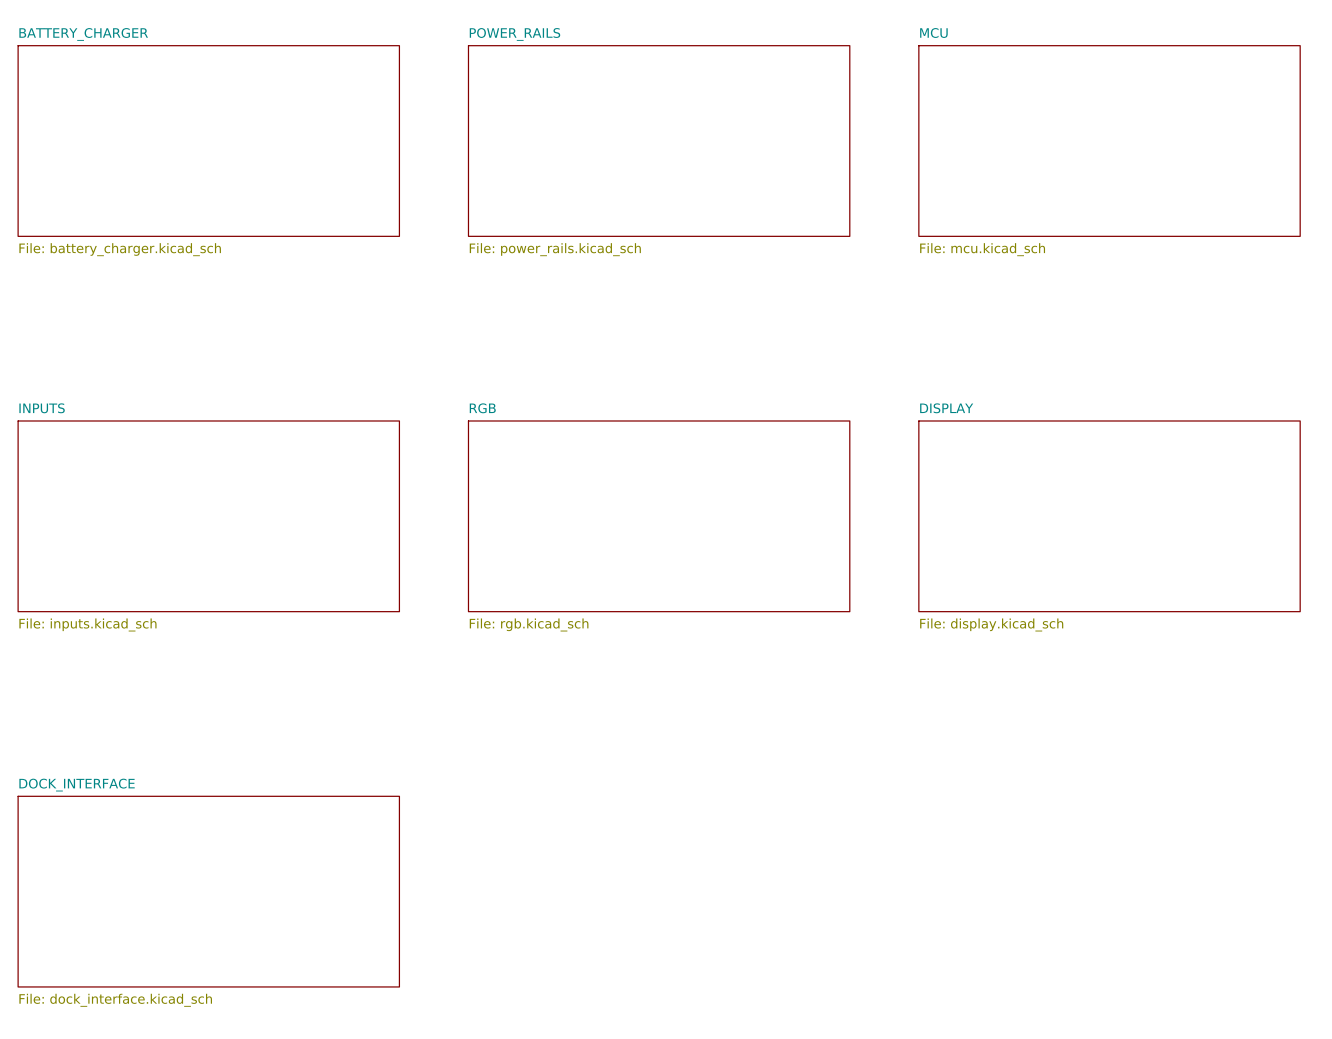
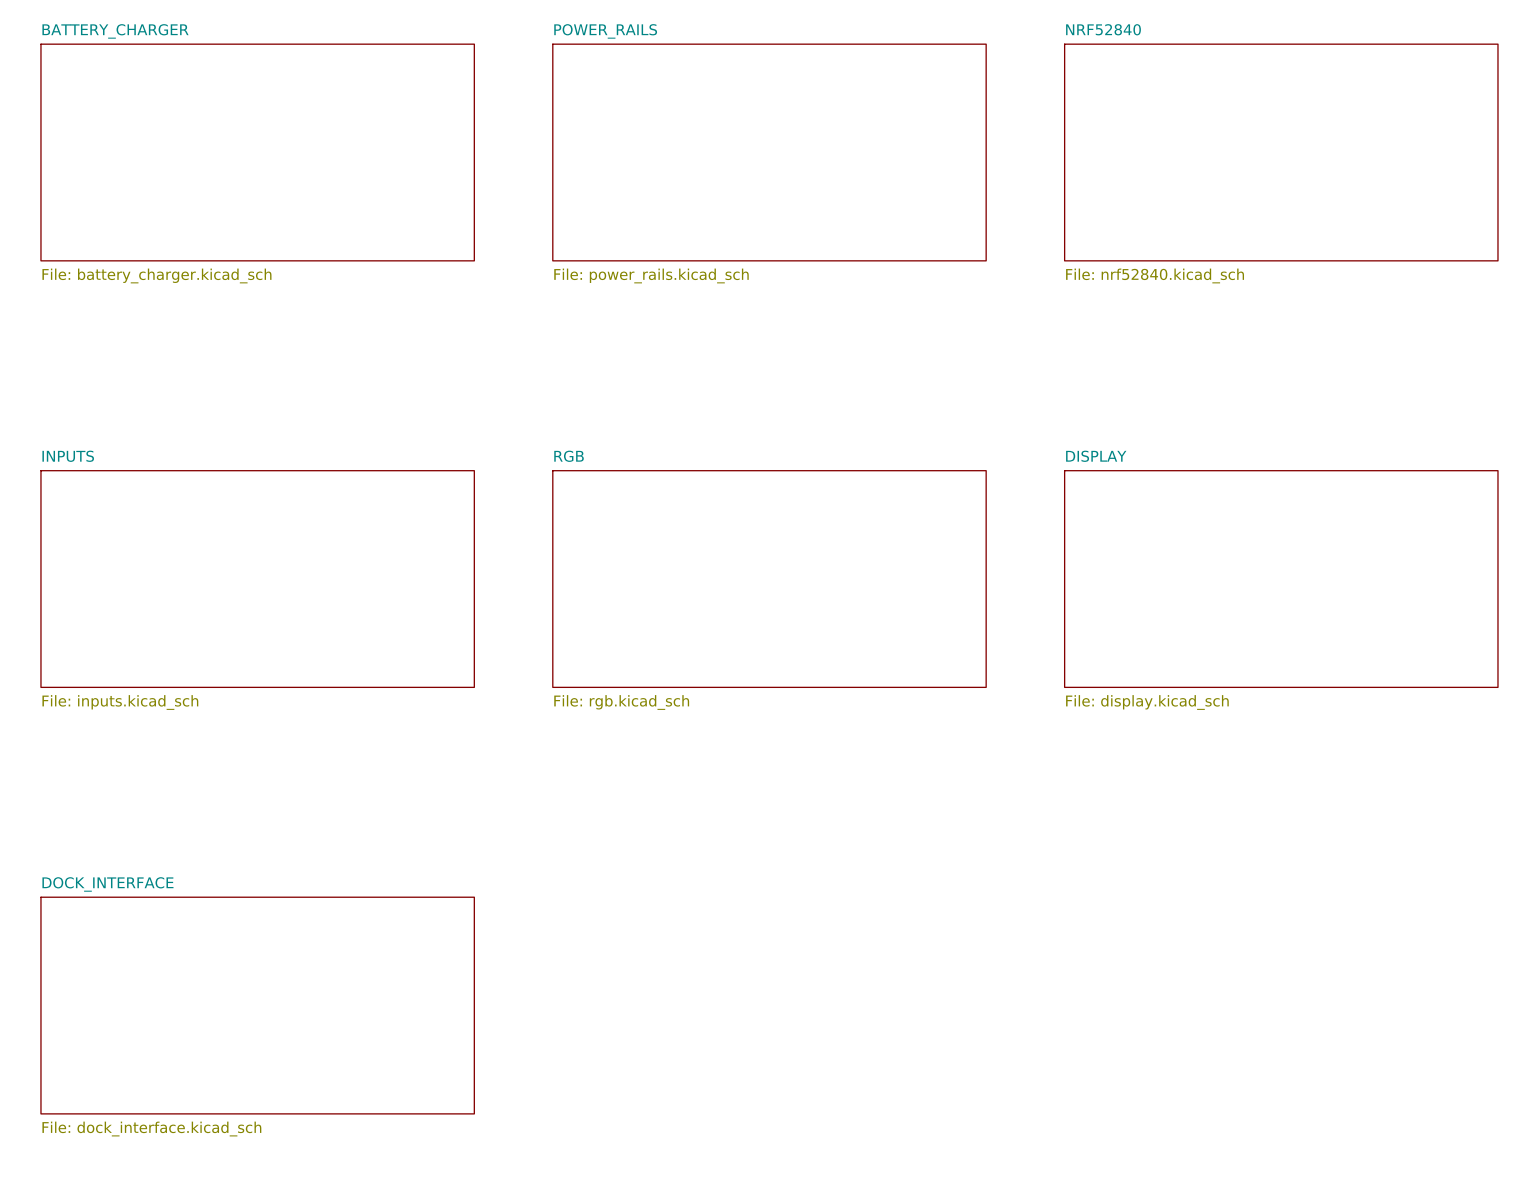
sheet MCU name: MCU (933, 33) -> NRF52840 (1103, 29)
sheet MCU value: File: mcu.kicad_sch (982, 249) -> File: nrf52840.kicad_sch (1155, 275)

